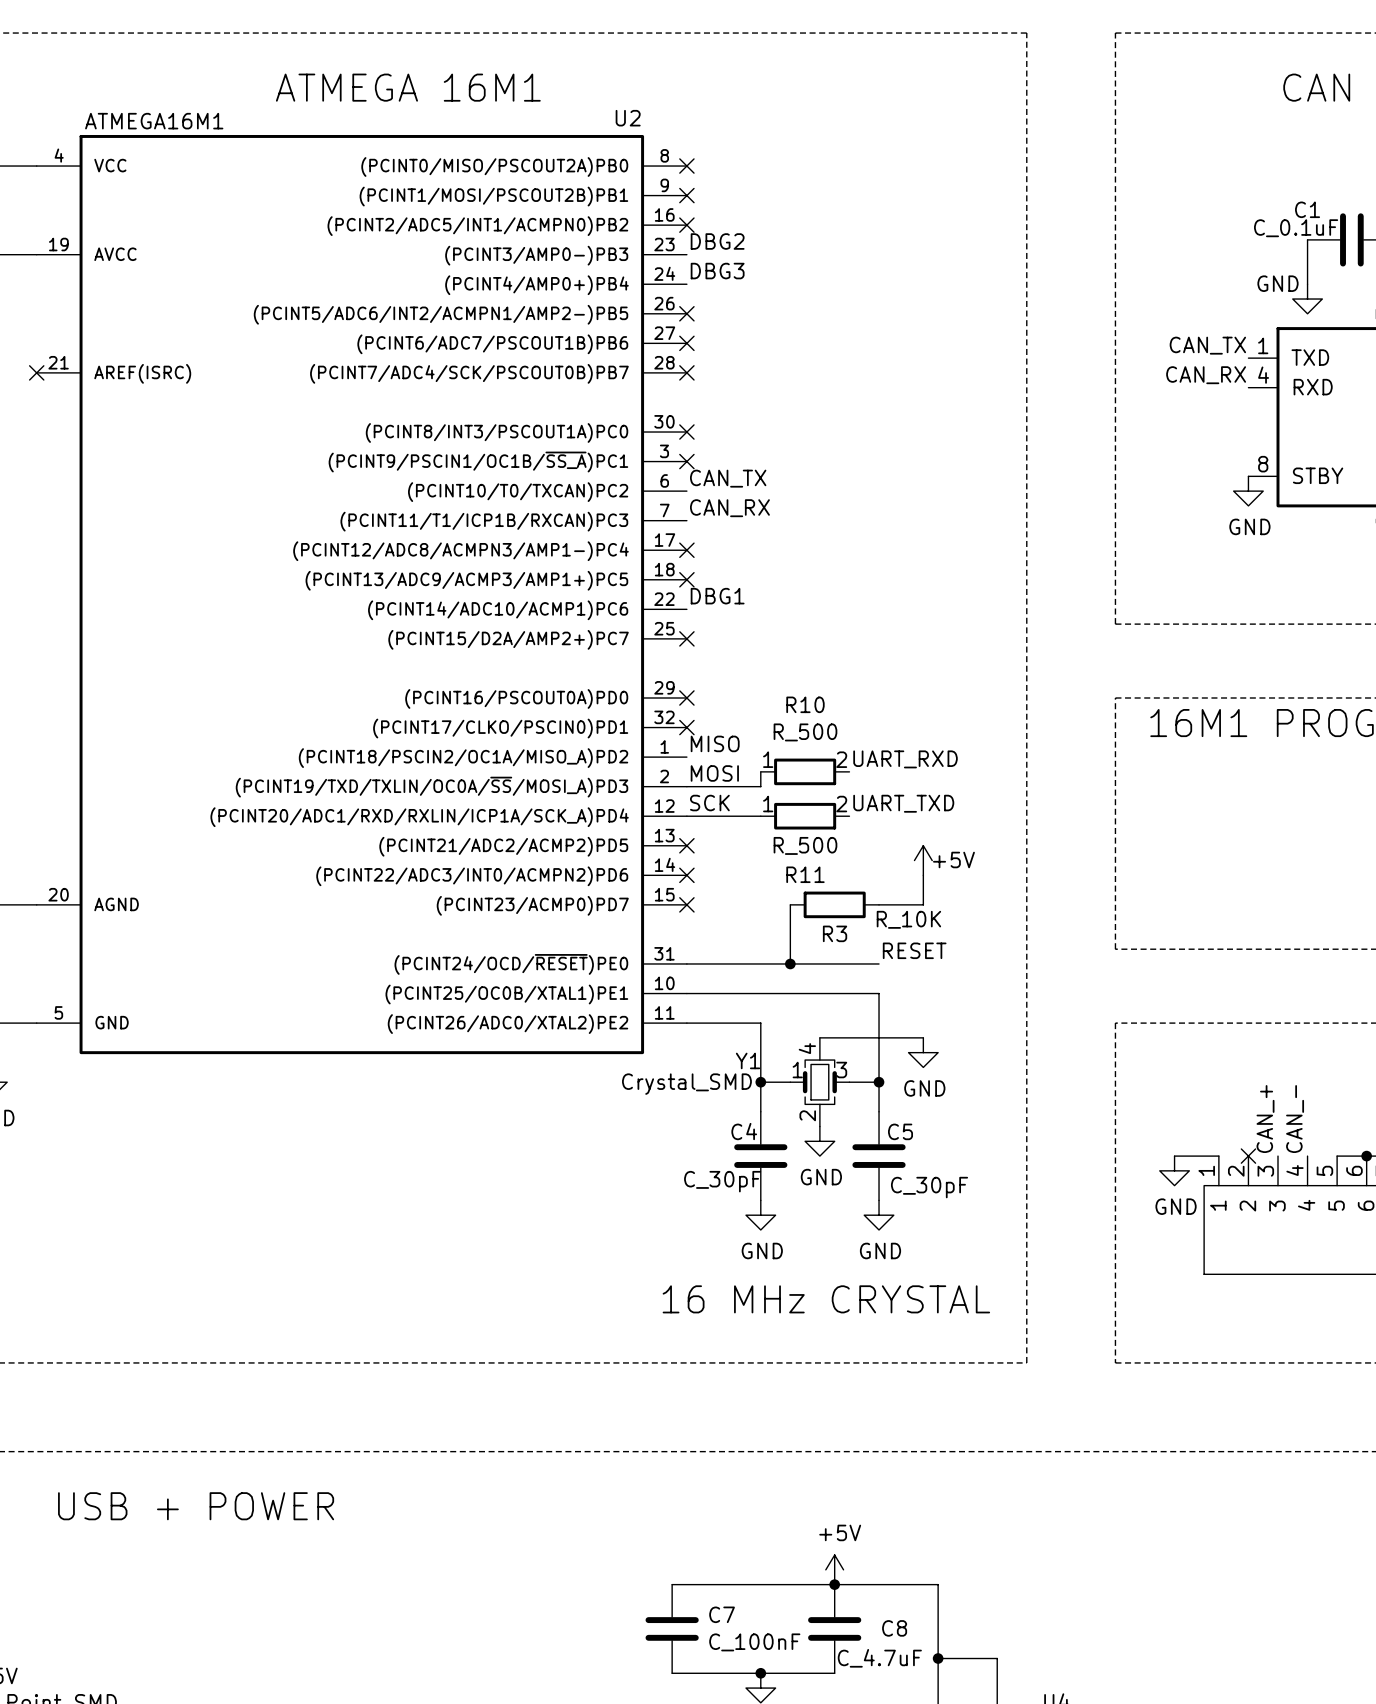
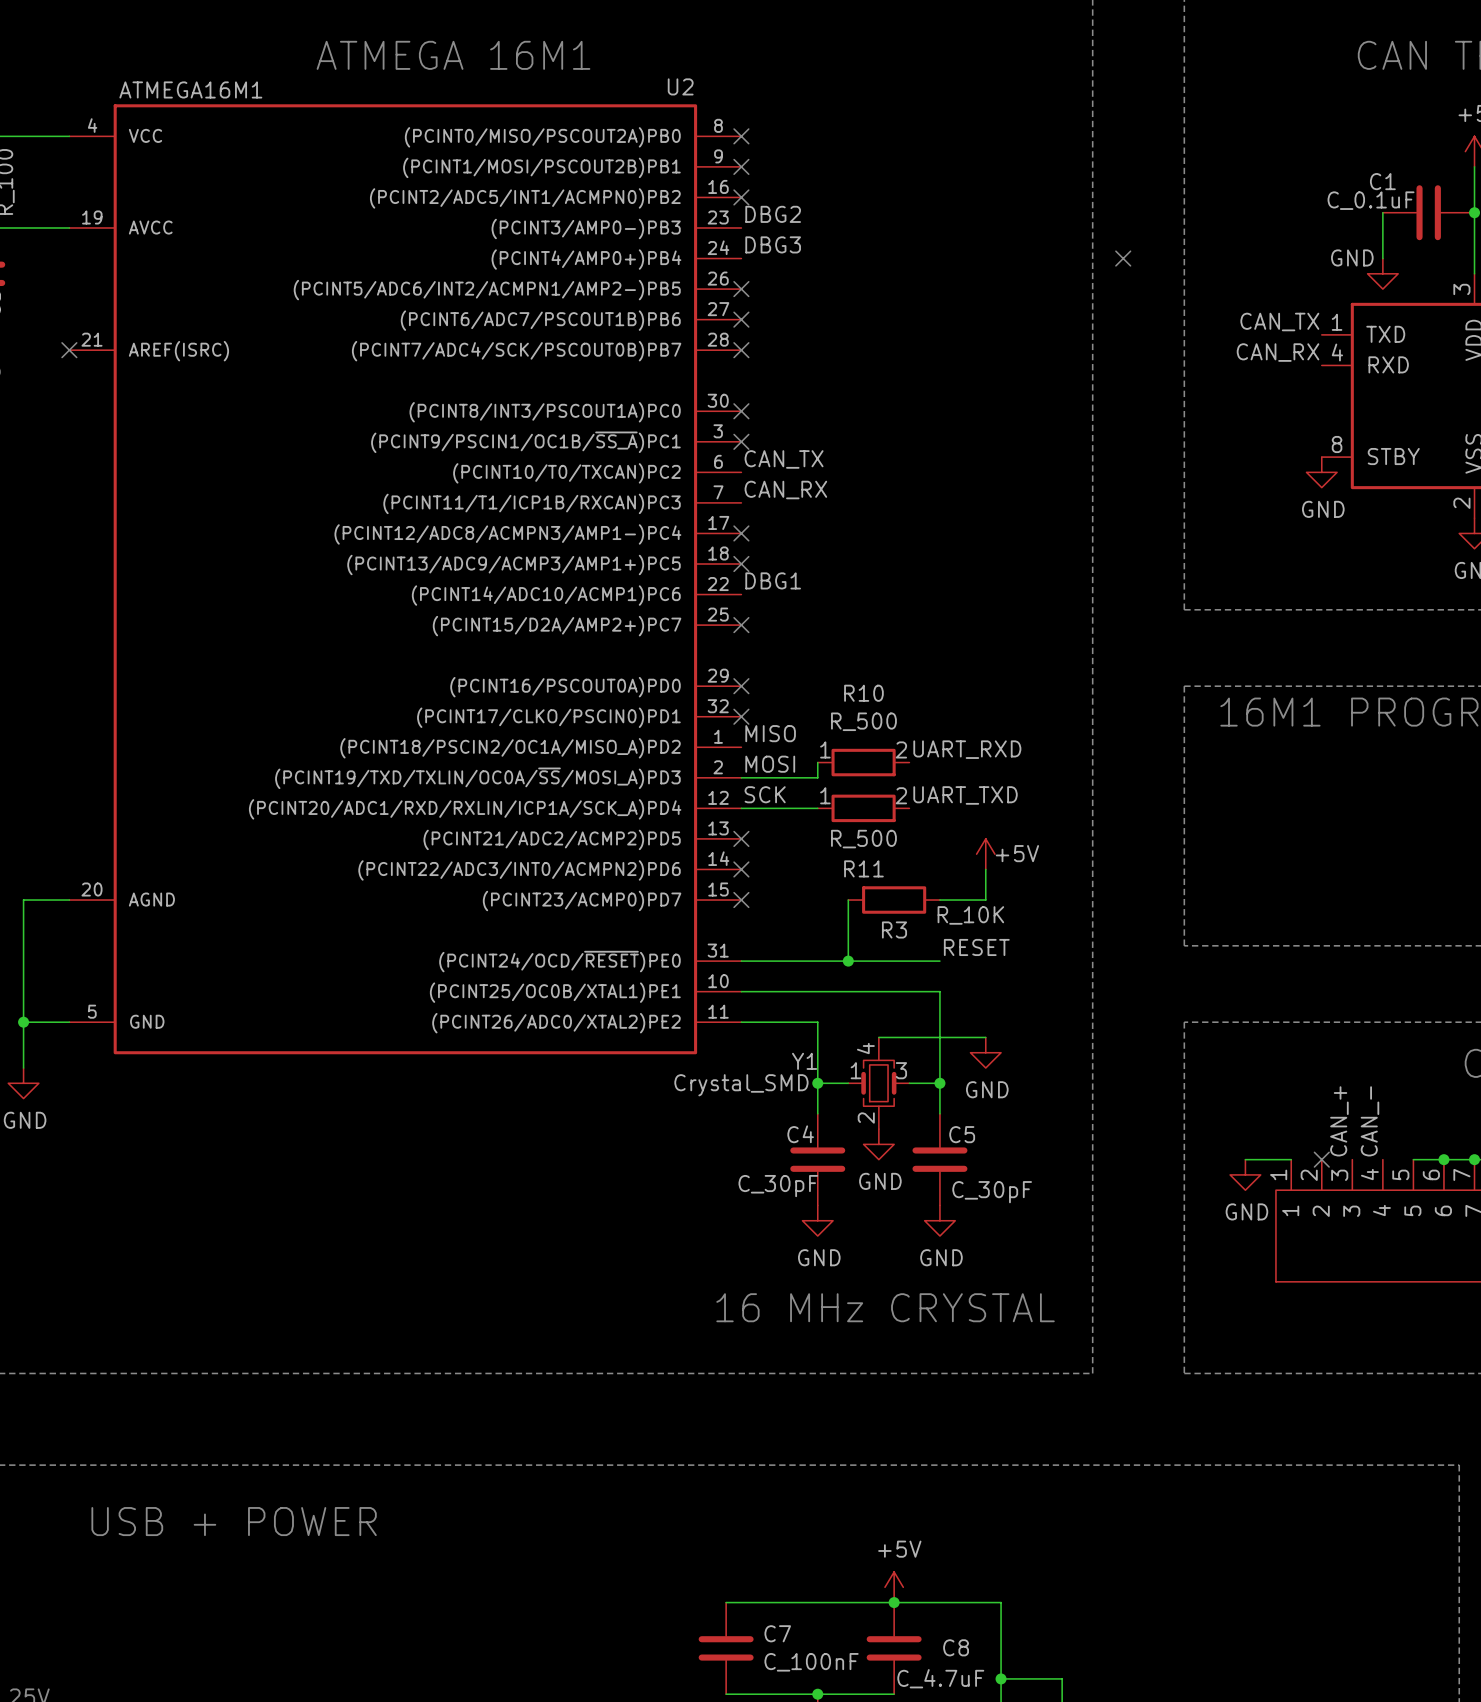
no-connect mark: none -> (1123, 258)

